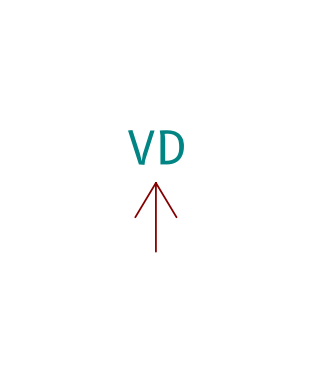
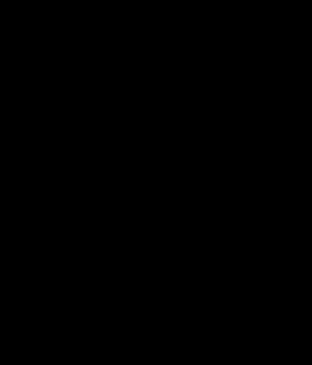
power symbol: VD (155, 217) -> none

